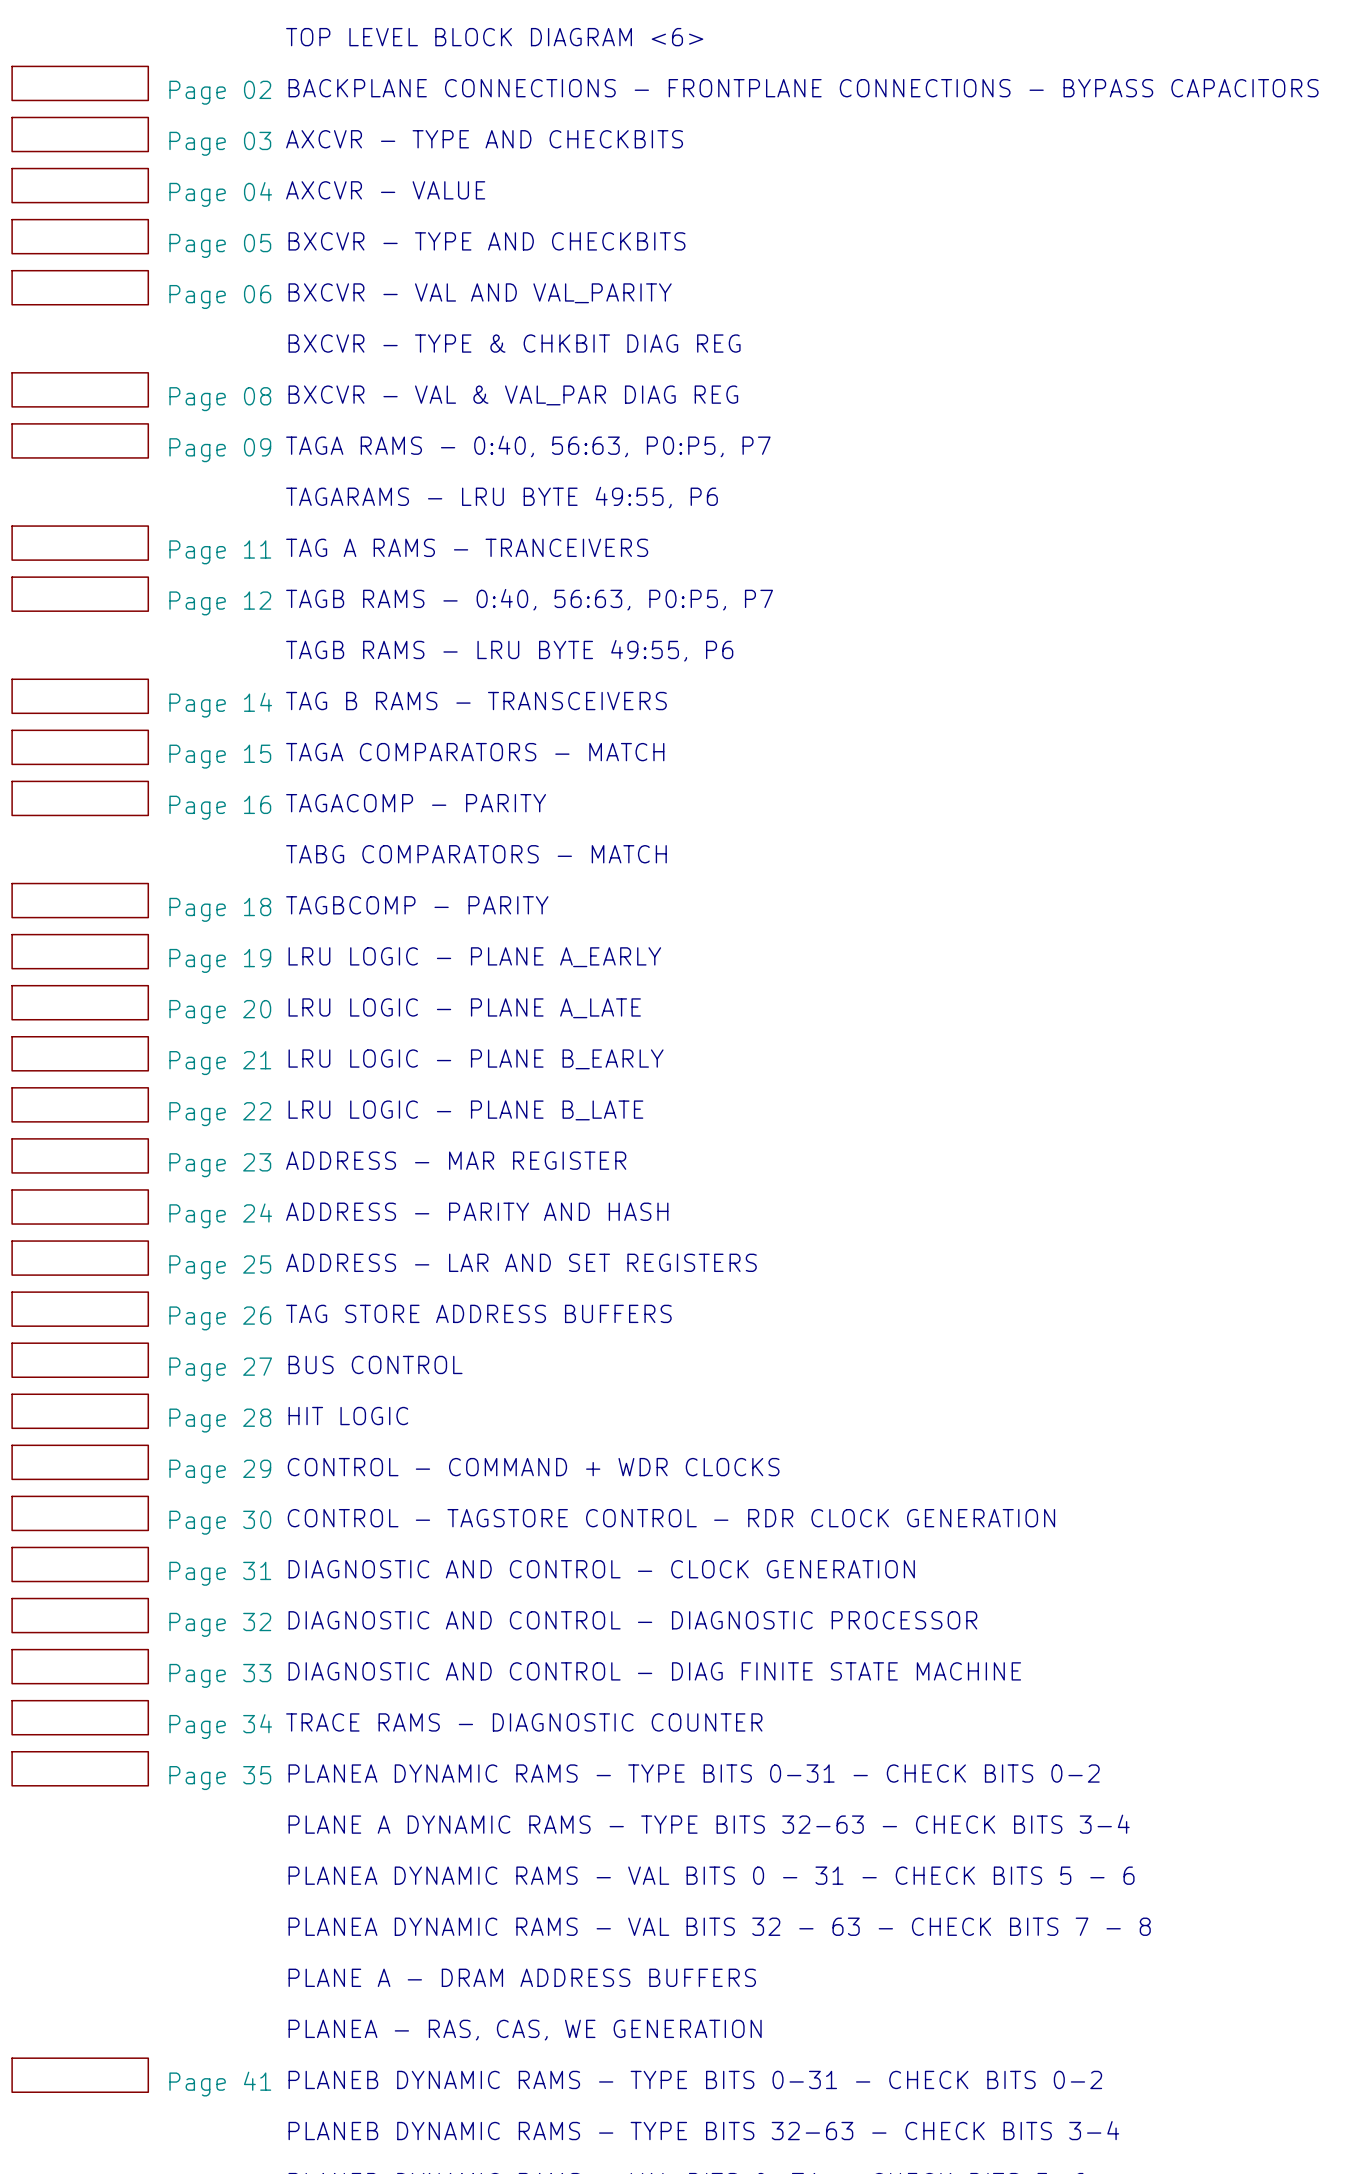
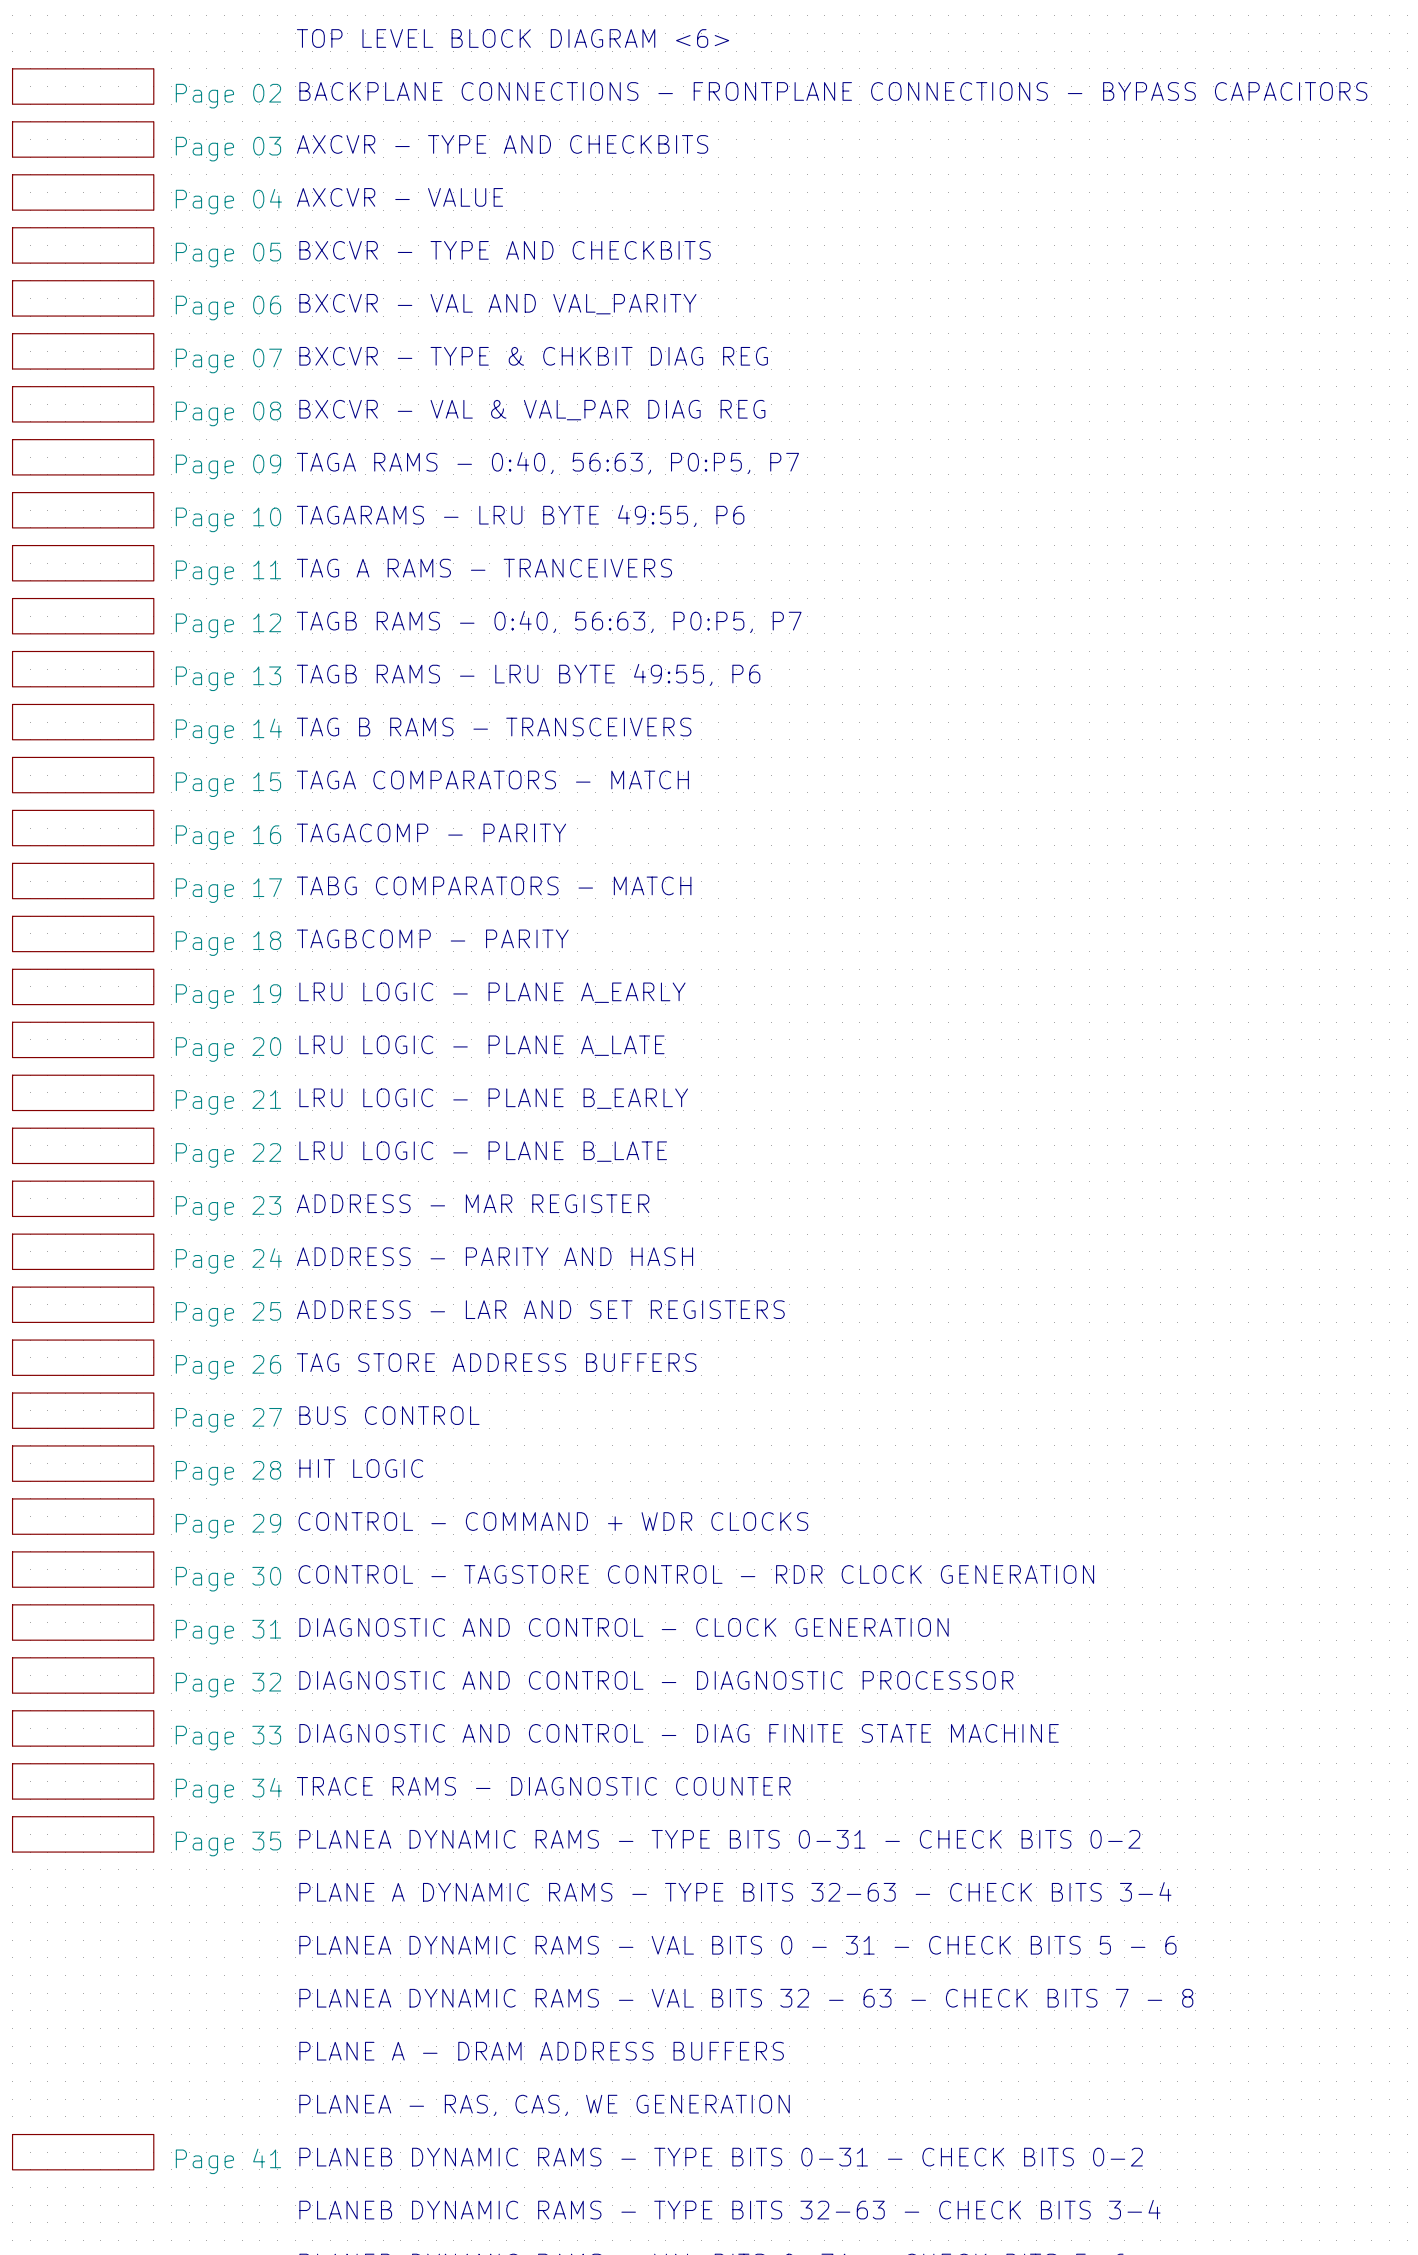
sheet Page 07: none -> (83, 351)
sheet Page 10: none -> (83, 510)
sheet Page 13: none -> (83, 669)
sheet Page 17: none -> (83, 881)

